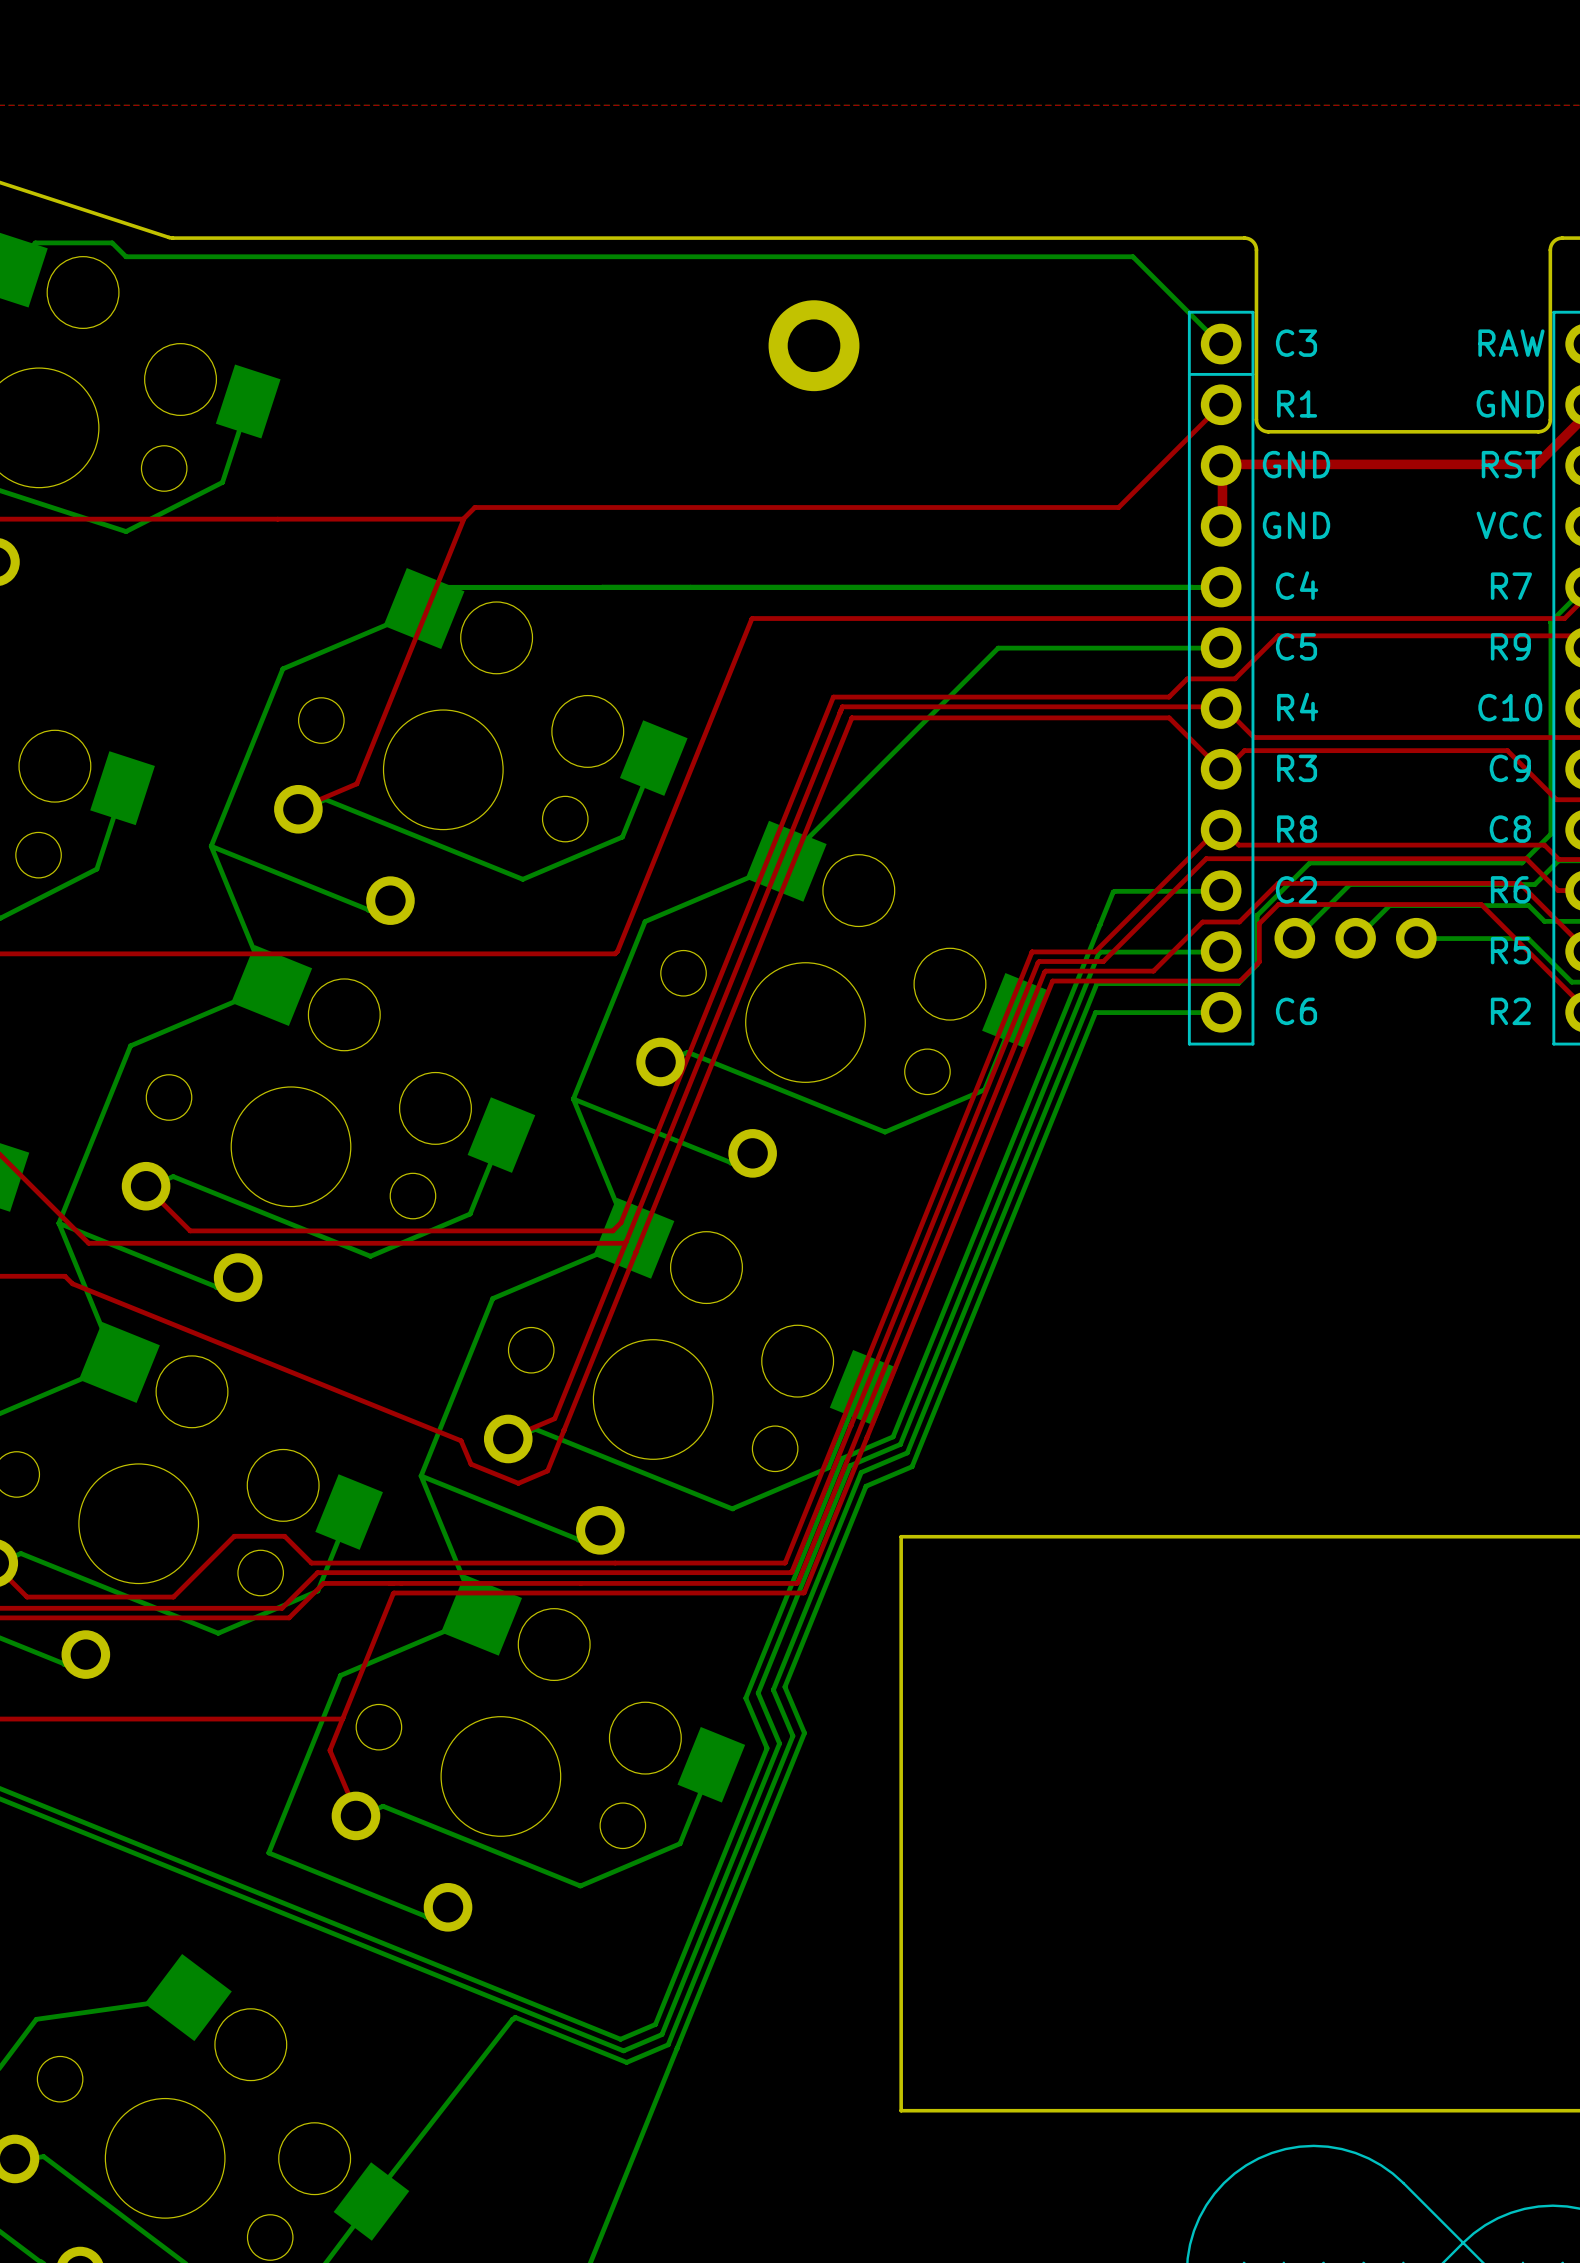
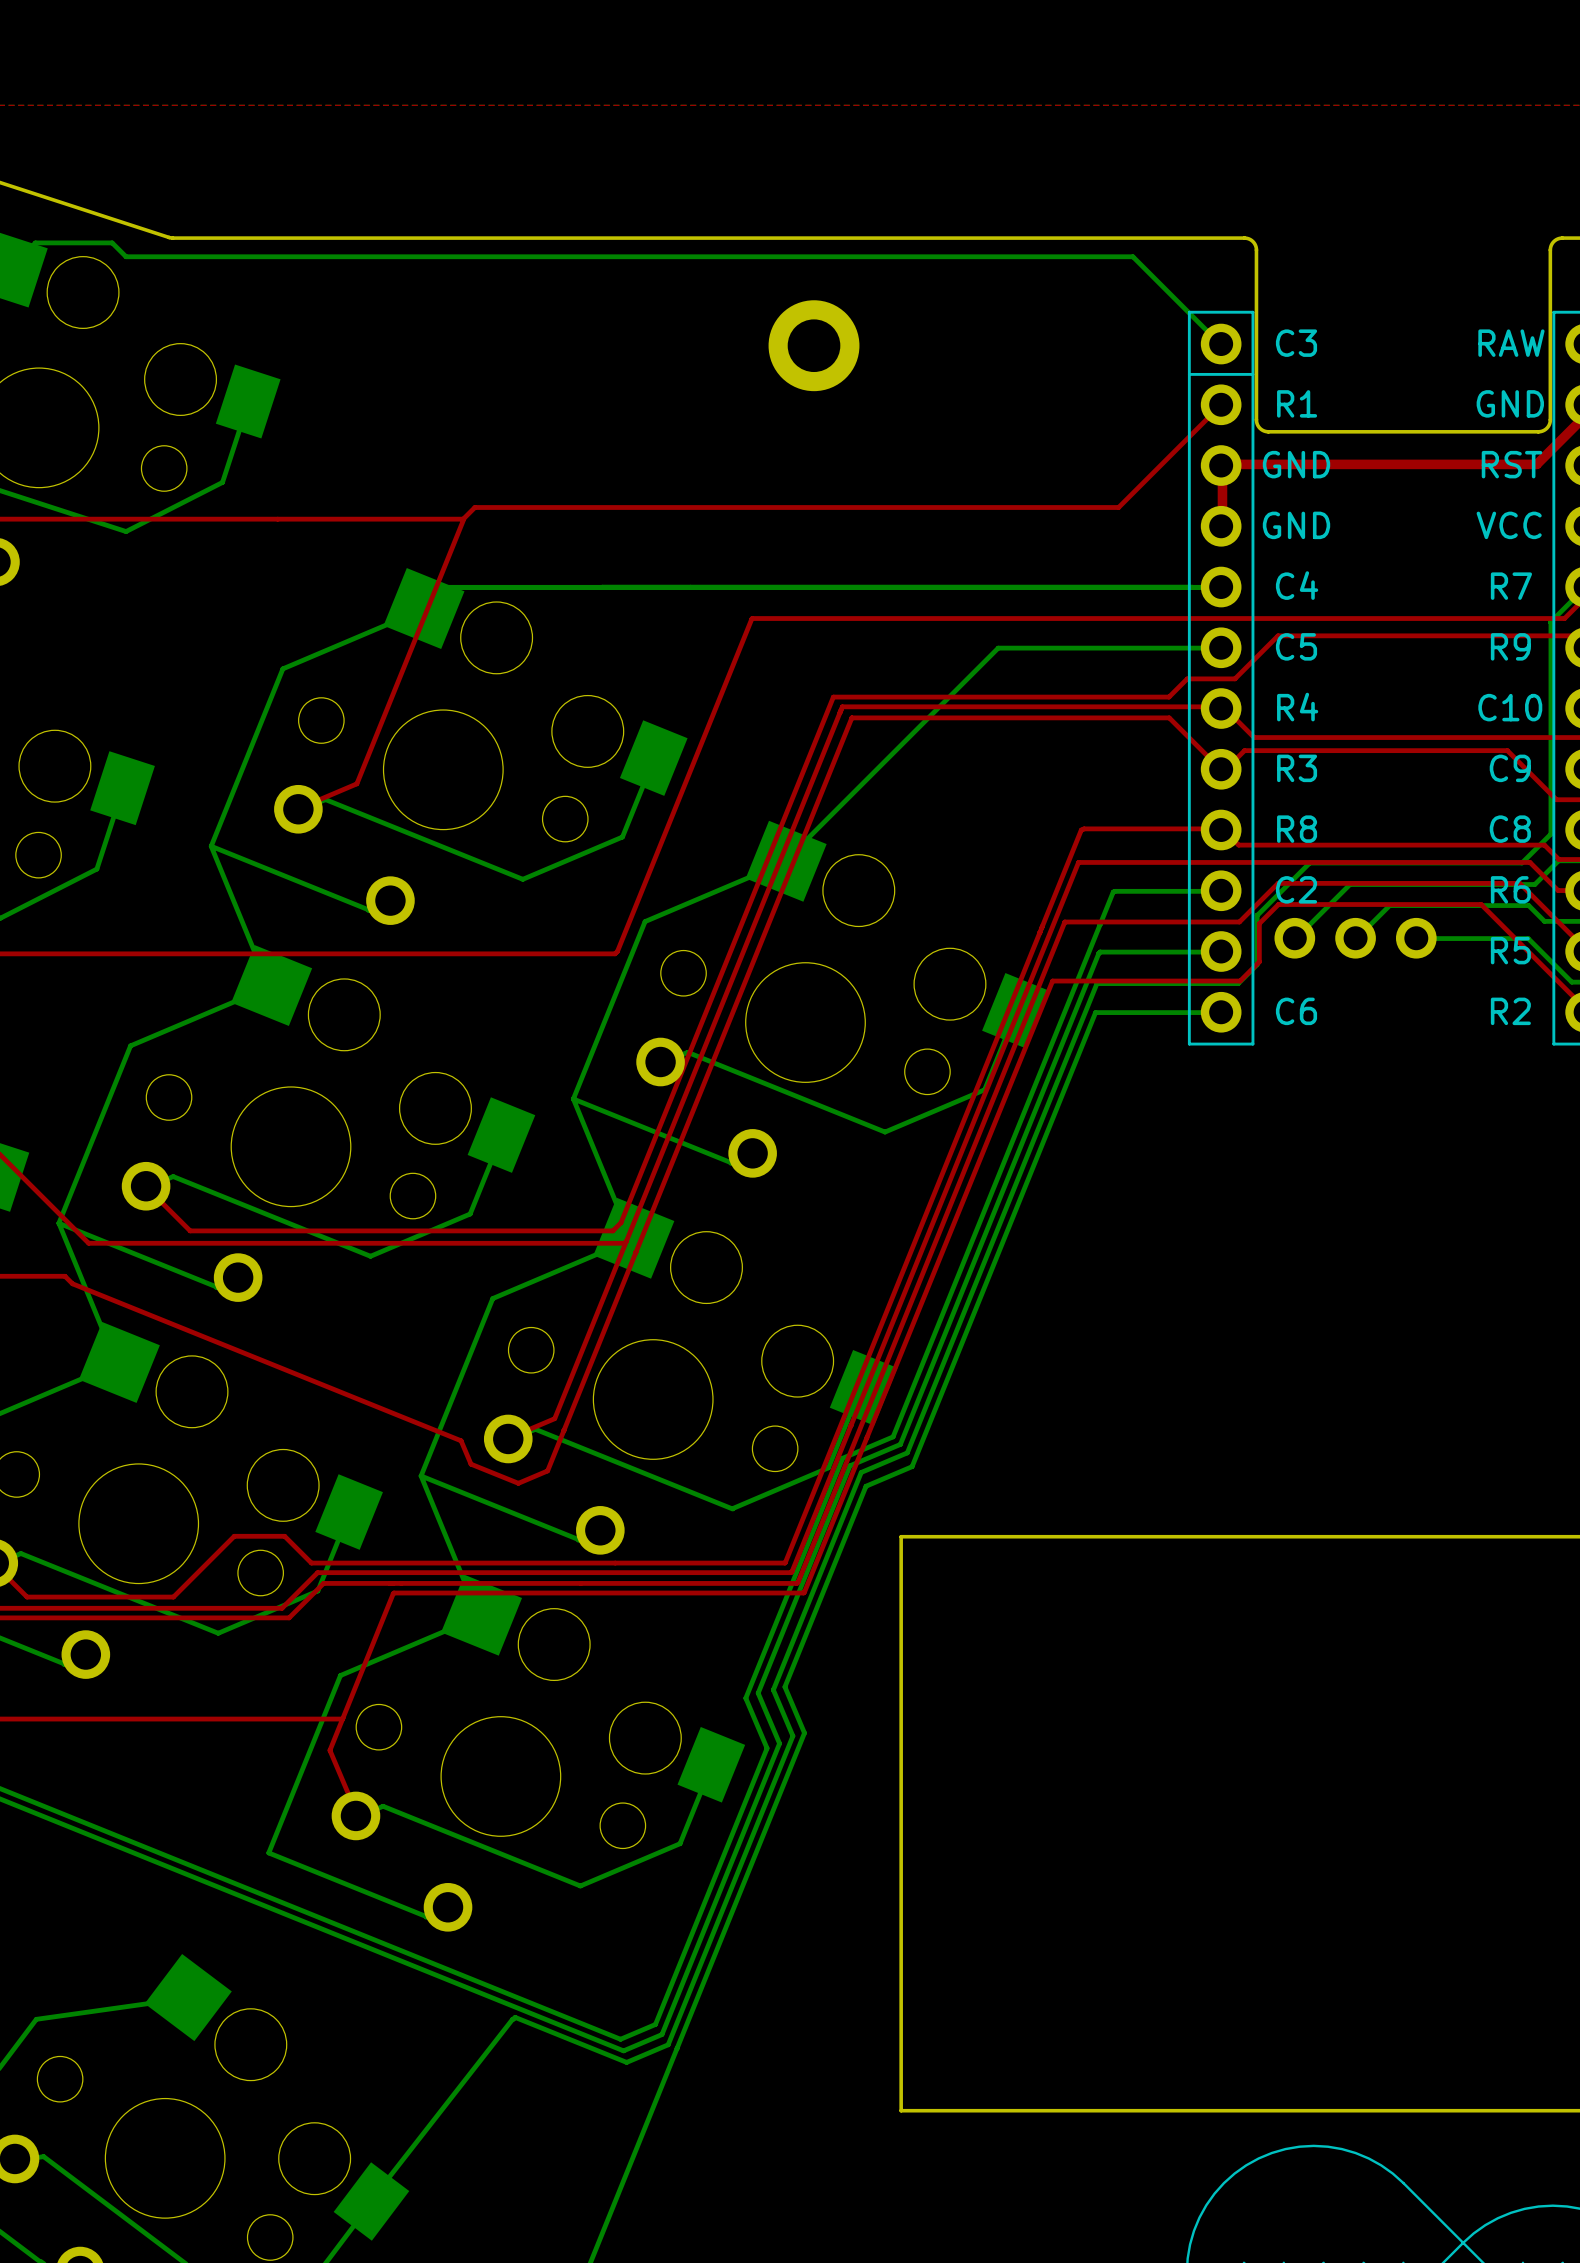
top track: (1218, 828) (1095, 951) (1032, 951) -> (1218, 828) (1081, 830) (1032, 951)
top track: (1530, 862) (1526, 858) (1206, 858) (1103, 961) (1038, 962) -> (1530, 862) (1078, 862) (1038, 962)
top track: none -> (1064, 922) (1044, 972)
top track: (1202, 922) (1153, 971) (1044, 972) -> (1202, 922) (1064, 922)

